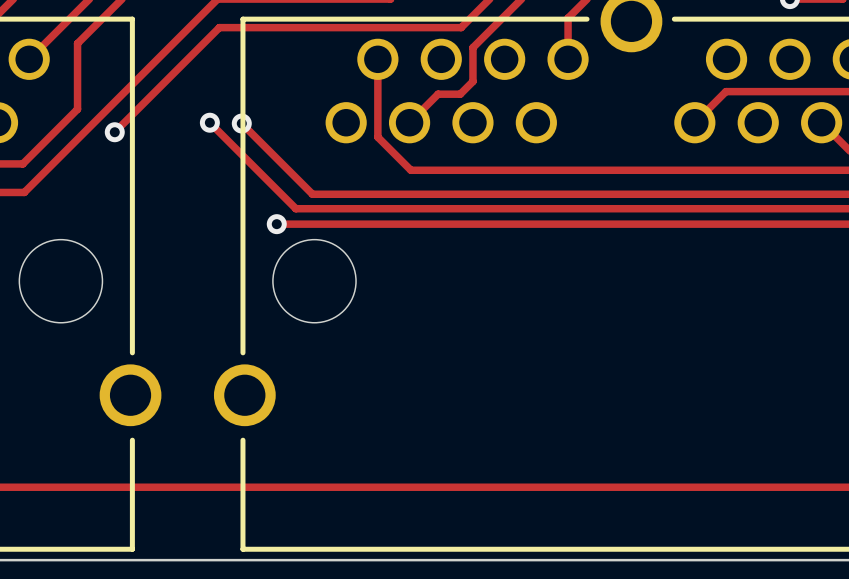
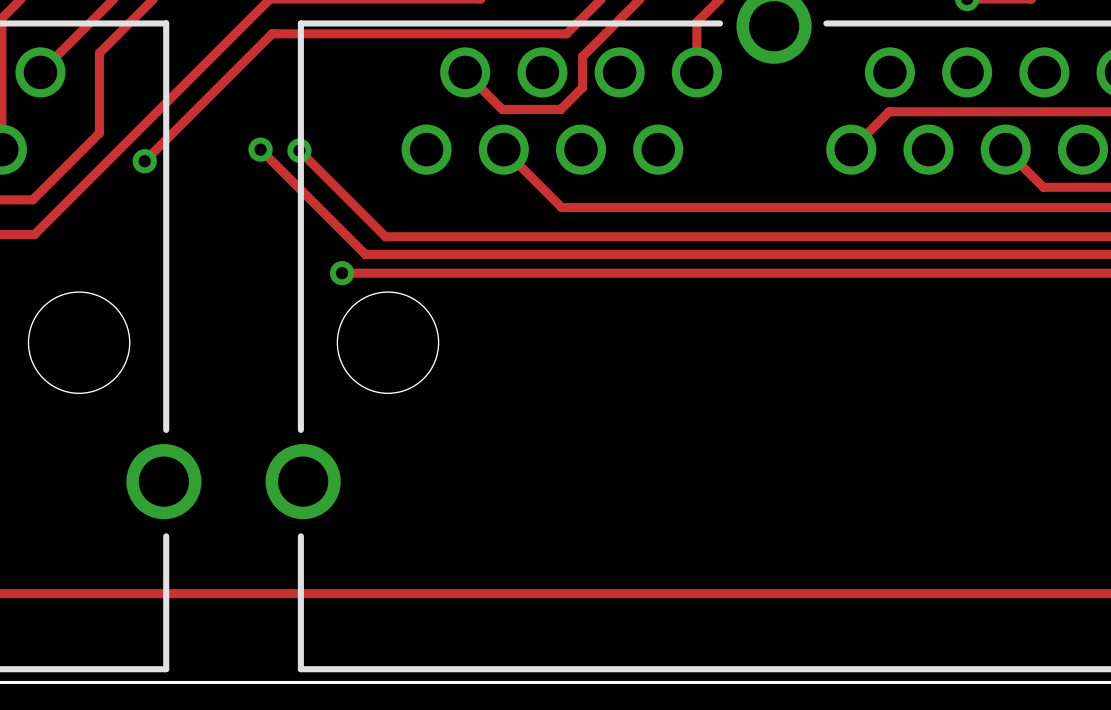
track: (474, 46) (472, 81) (460, 94) (438, 94) (409, 122) -> (582, 56) (582, 87) (560, 109) (502, 109) (465, 72)
track: (377, 59) (377, 137) (410, 170) (457, 170) -> (503, 149) (561, 207)

